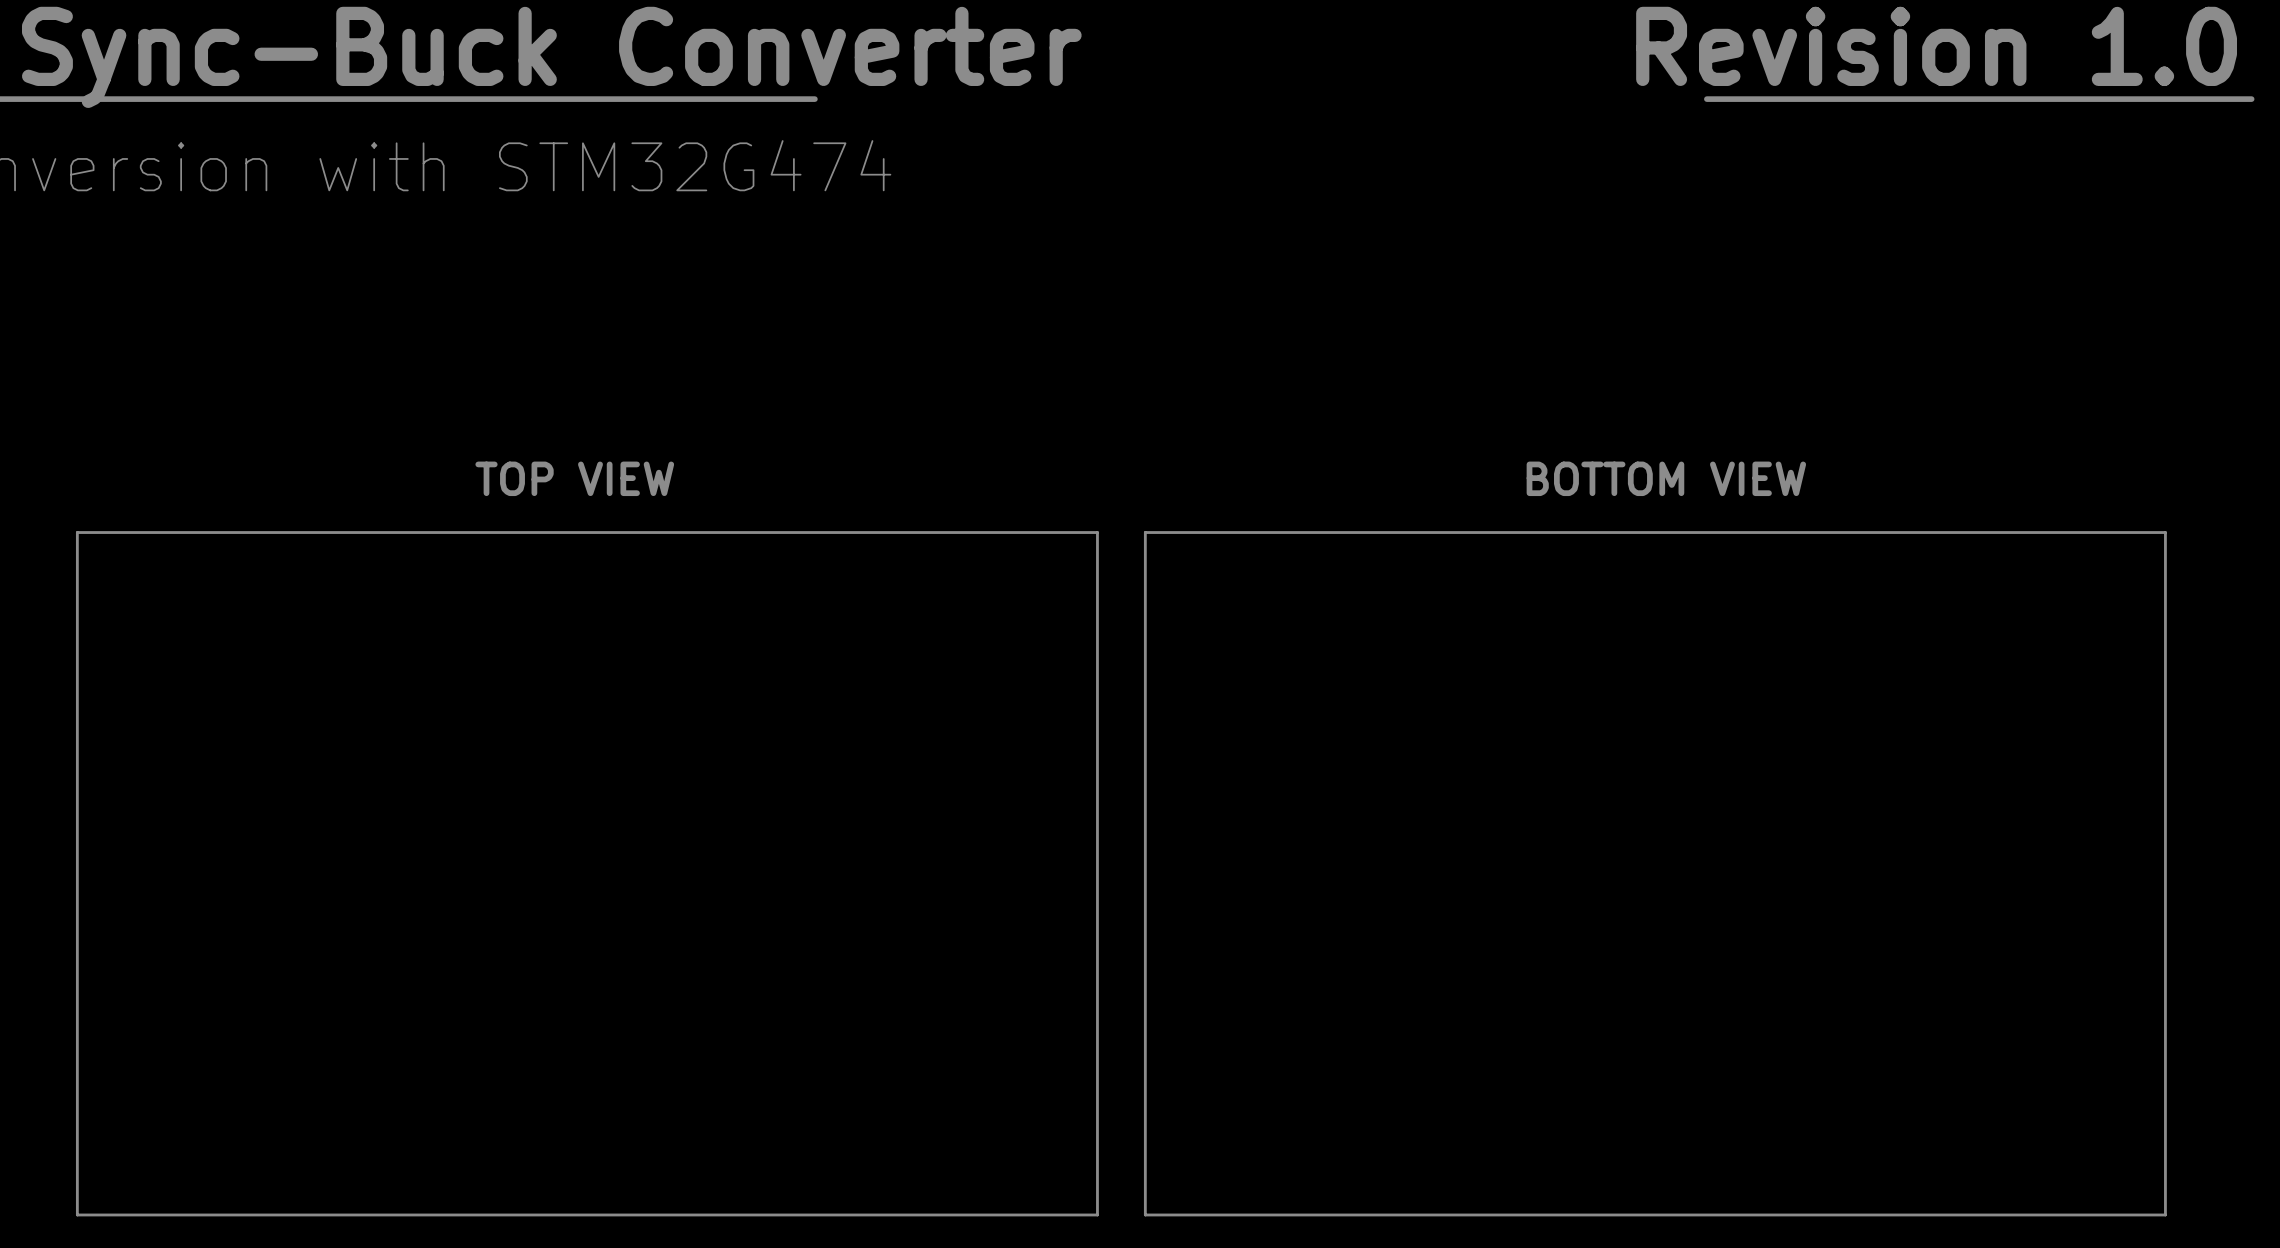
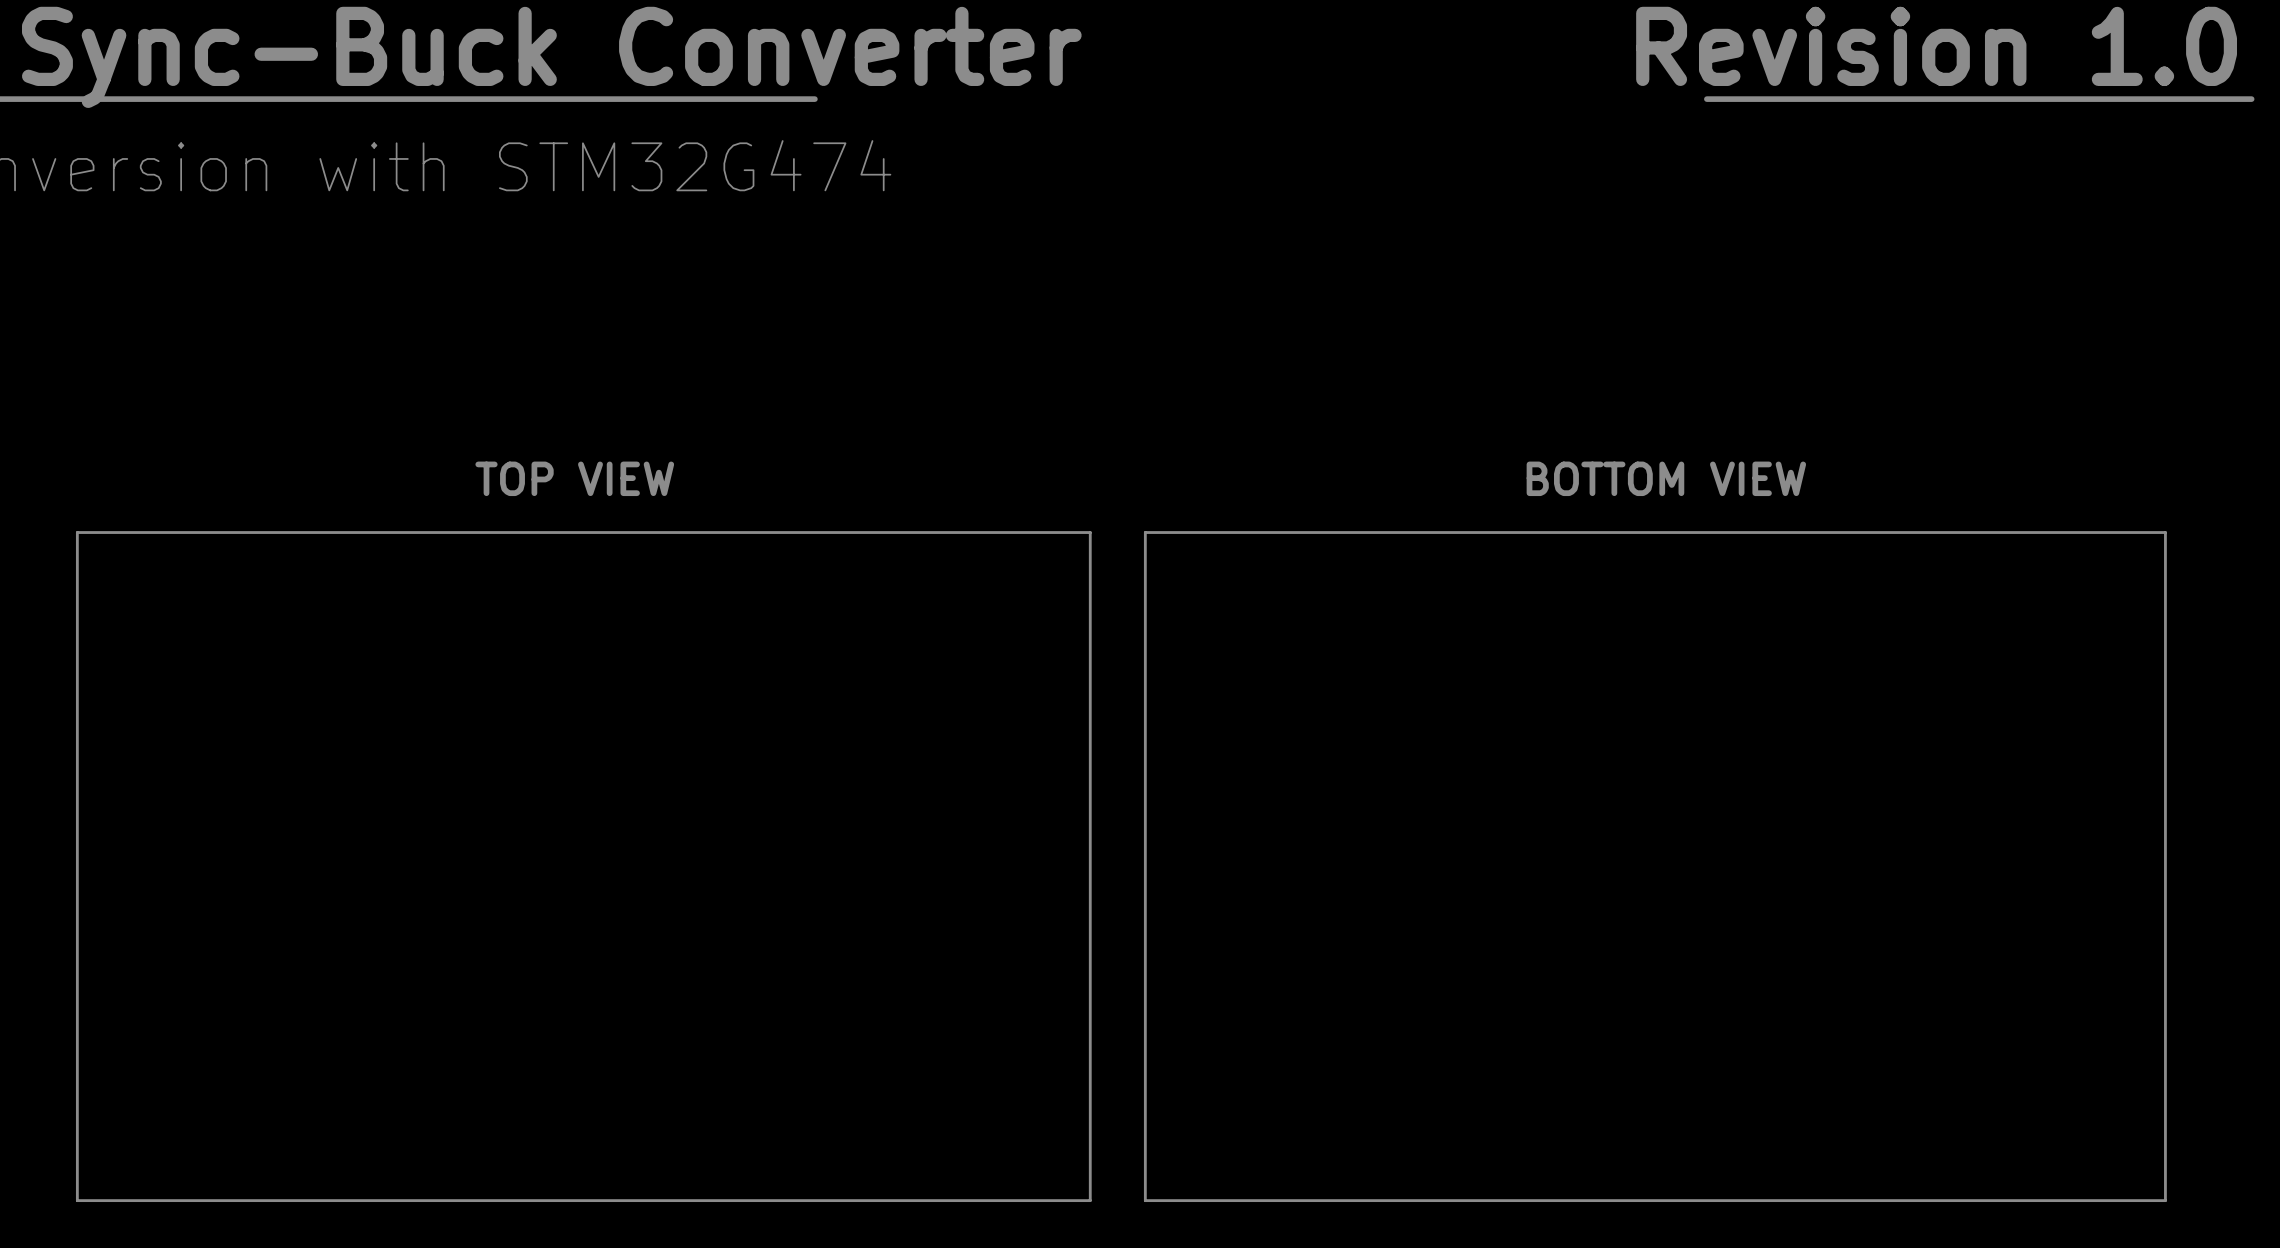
line: (1090, 532) (1097, 532) (1097, 1214) (77, 1214) (77, 1200) -> (1090, 532) (1090, 1200) (77, 1200)
line: (1145, 1200) (1145, 1214) (2165, 1214) (2165, 1200) -> (1145, 1200) (2165, 1200)

